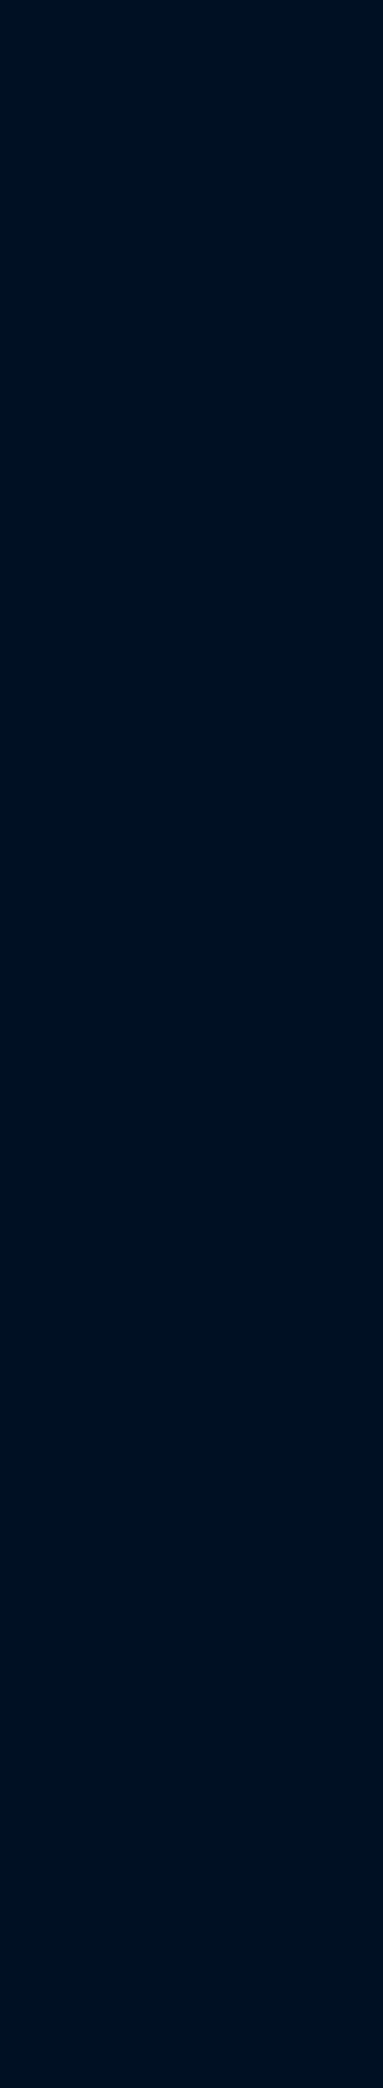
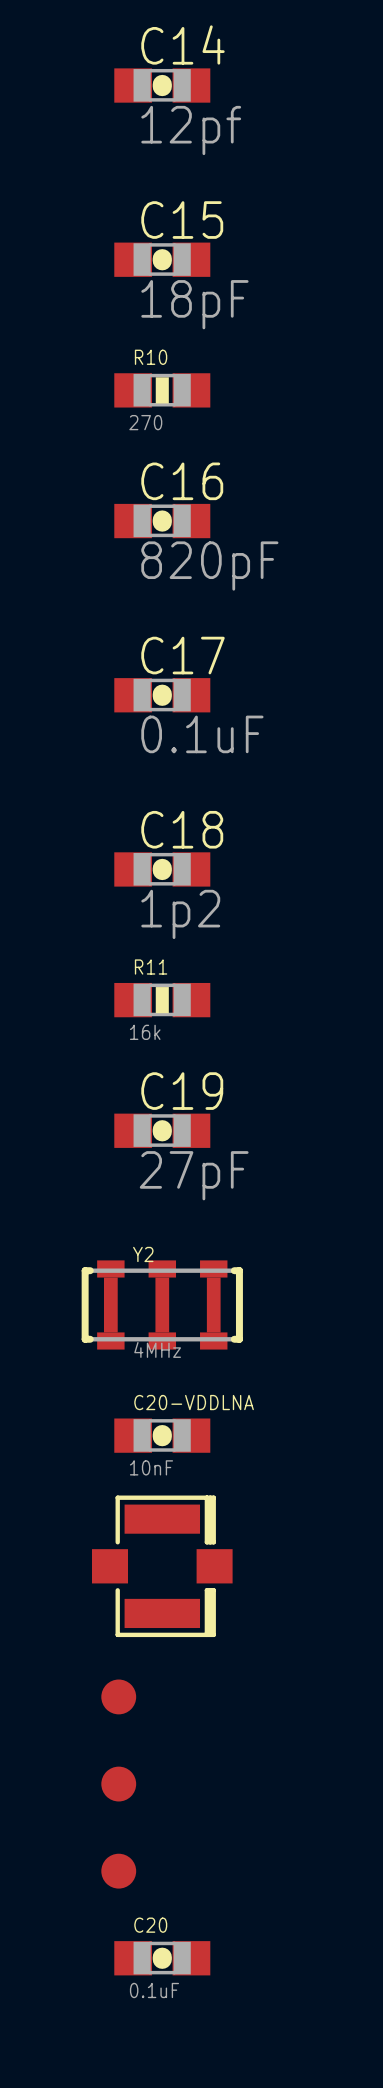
C14: none -> 12pf (162, 85)
C15: none -> 18pF (162, 259)
R10: none -> 270 (162, 390)
C16: none -> 820pF (162, 521)
C17: none -> 0.1uF (162, 695)
C18: none -> 1p2 (162, 869)
R11: none -> 16k (162, 1000)
C19: none -> 27pF (162, 1130)
Y2: none -> 4MHz (162, 1304)
C20-VDDLNA: none -> 10nF (162, 1435)
part: none -> (162, 1566)
part: none -> (118, 1696)
part: none -> (118, 1784)
part: none -> (118, 1871)
C20: none -> 0.1uF (162, 1958)

